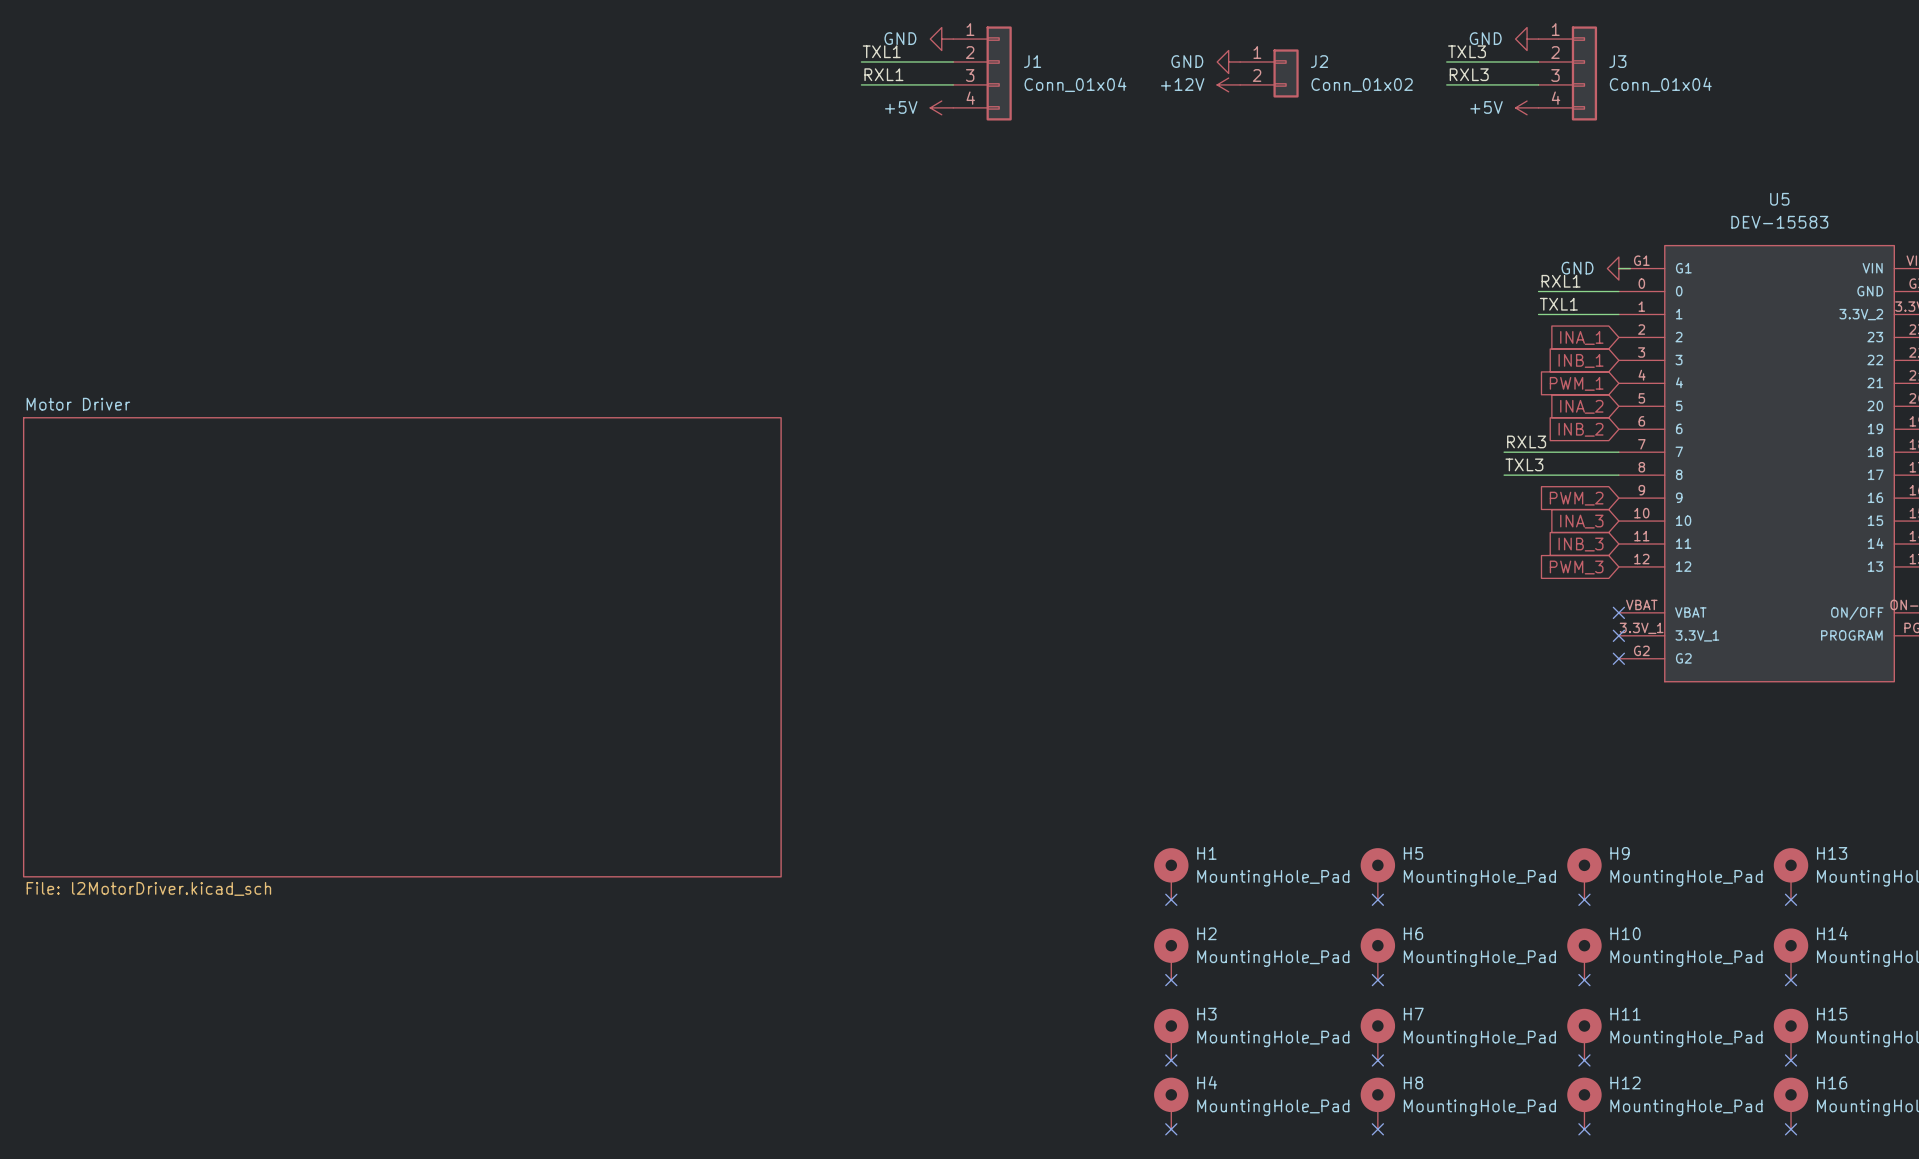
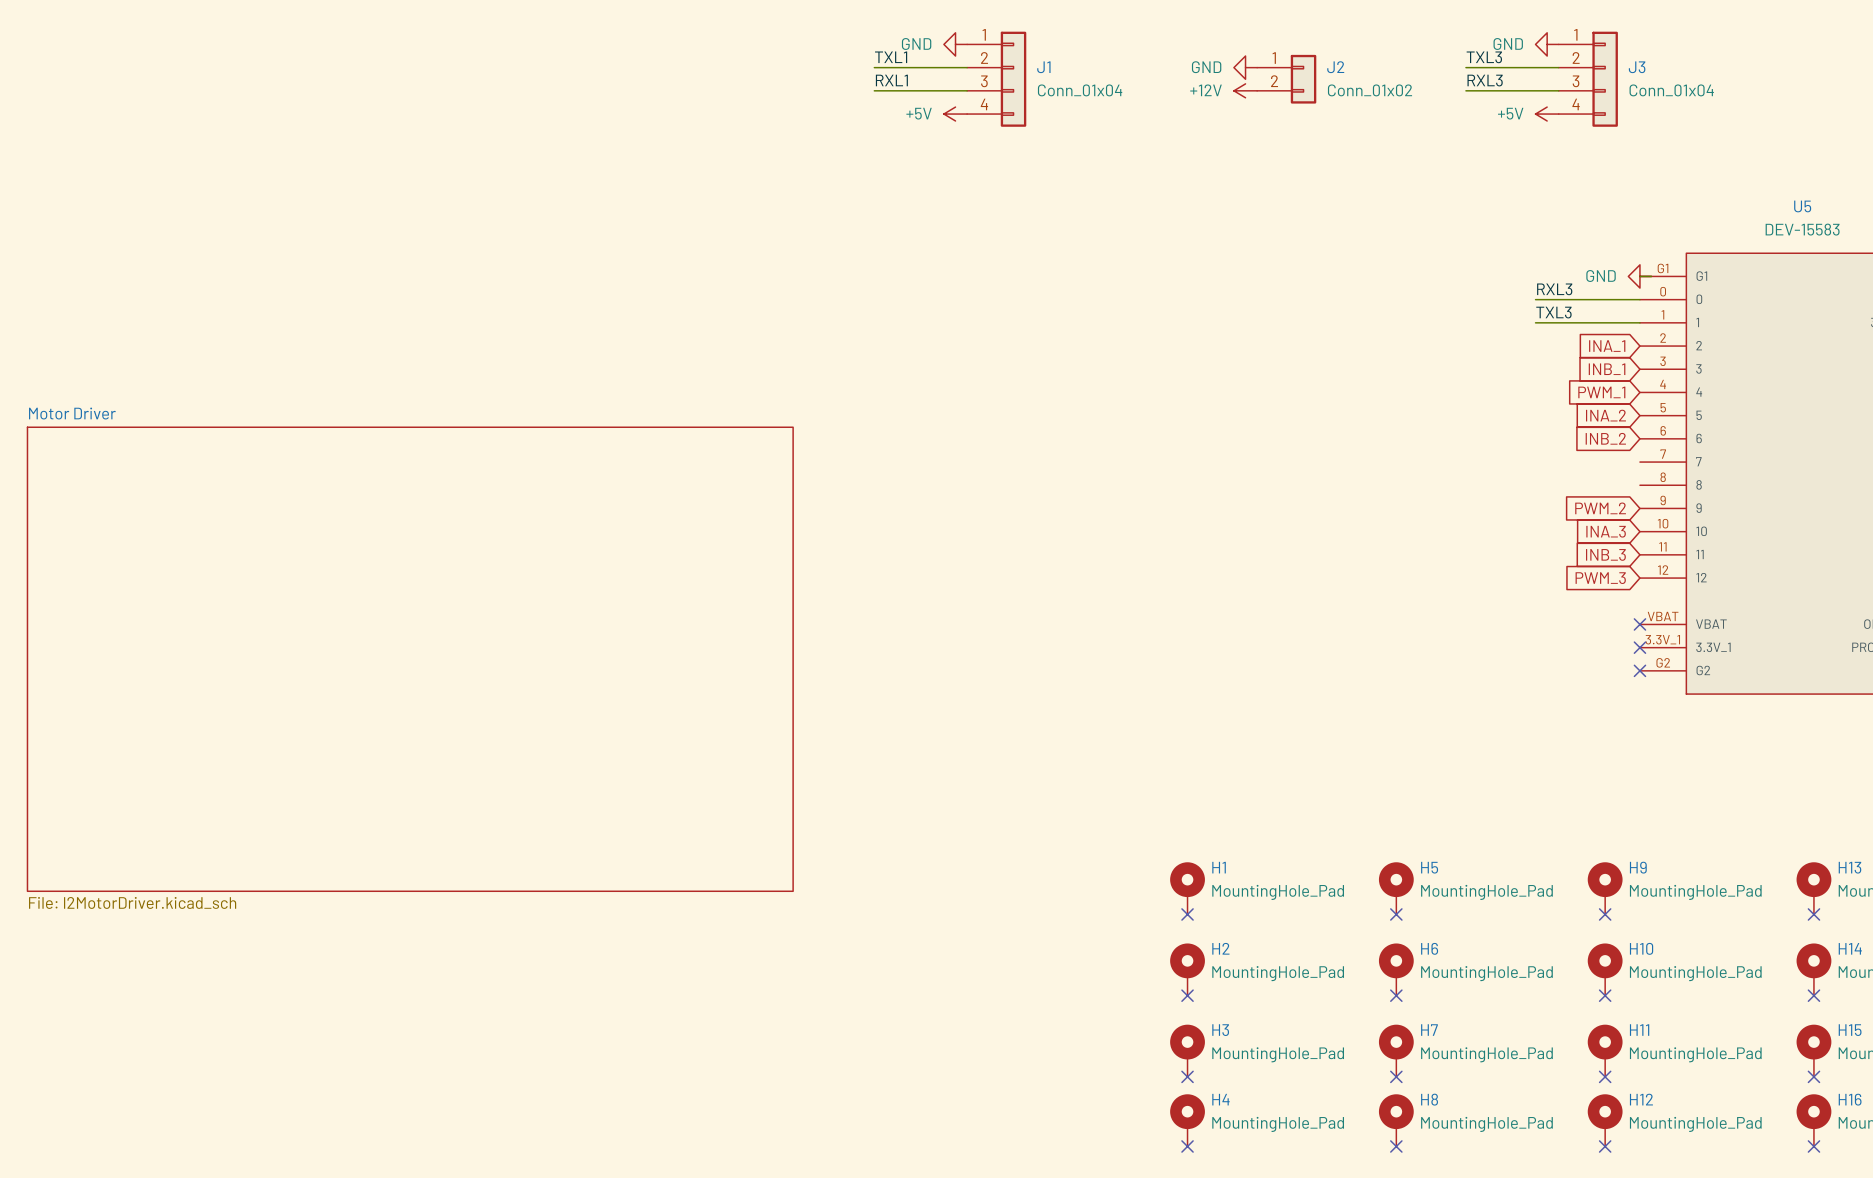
label: RXL1 (1561, 281) -> none
wire: none -> (1535, 299) (1558, 299)
label: TXL1 (1558, 304) -> none
wire: none -> (1535, 322) (1558, 322)
label position: RXL3 (1526, 441) -> RXL3 (1554, 289)
wire: (1504, 452) (1618, 452) -> none
label position: TXL3 (1524, 464) -> TXL3 (1553, 312)
wire: (1504, 475) (1618, 475) -> none

